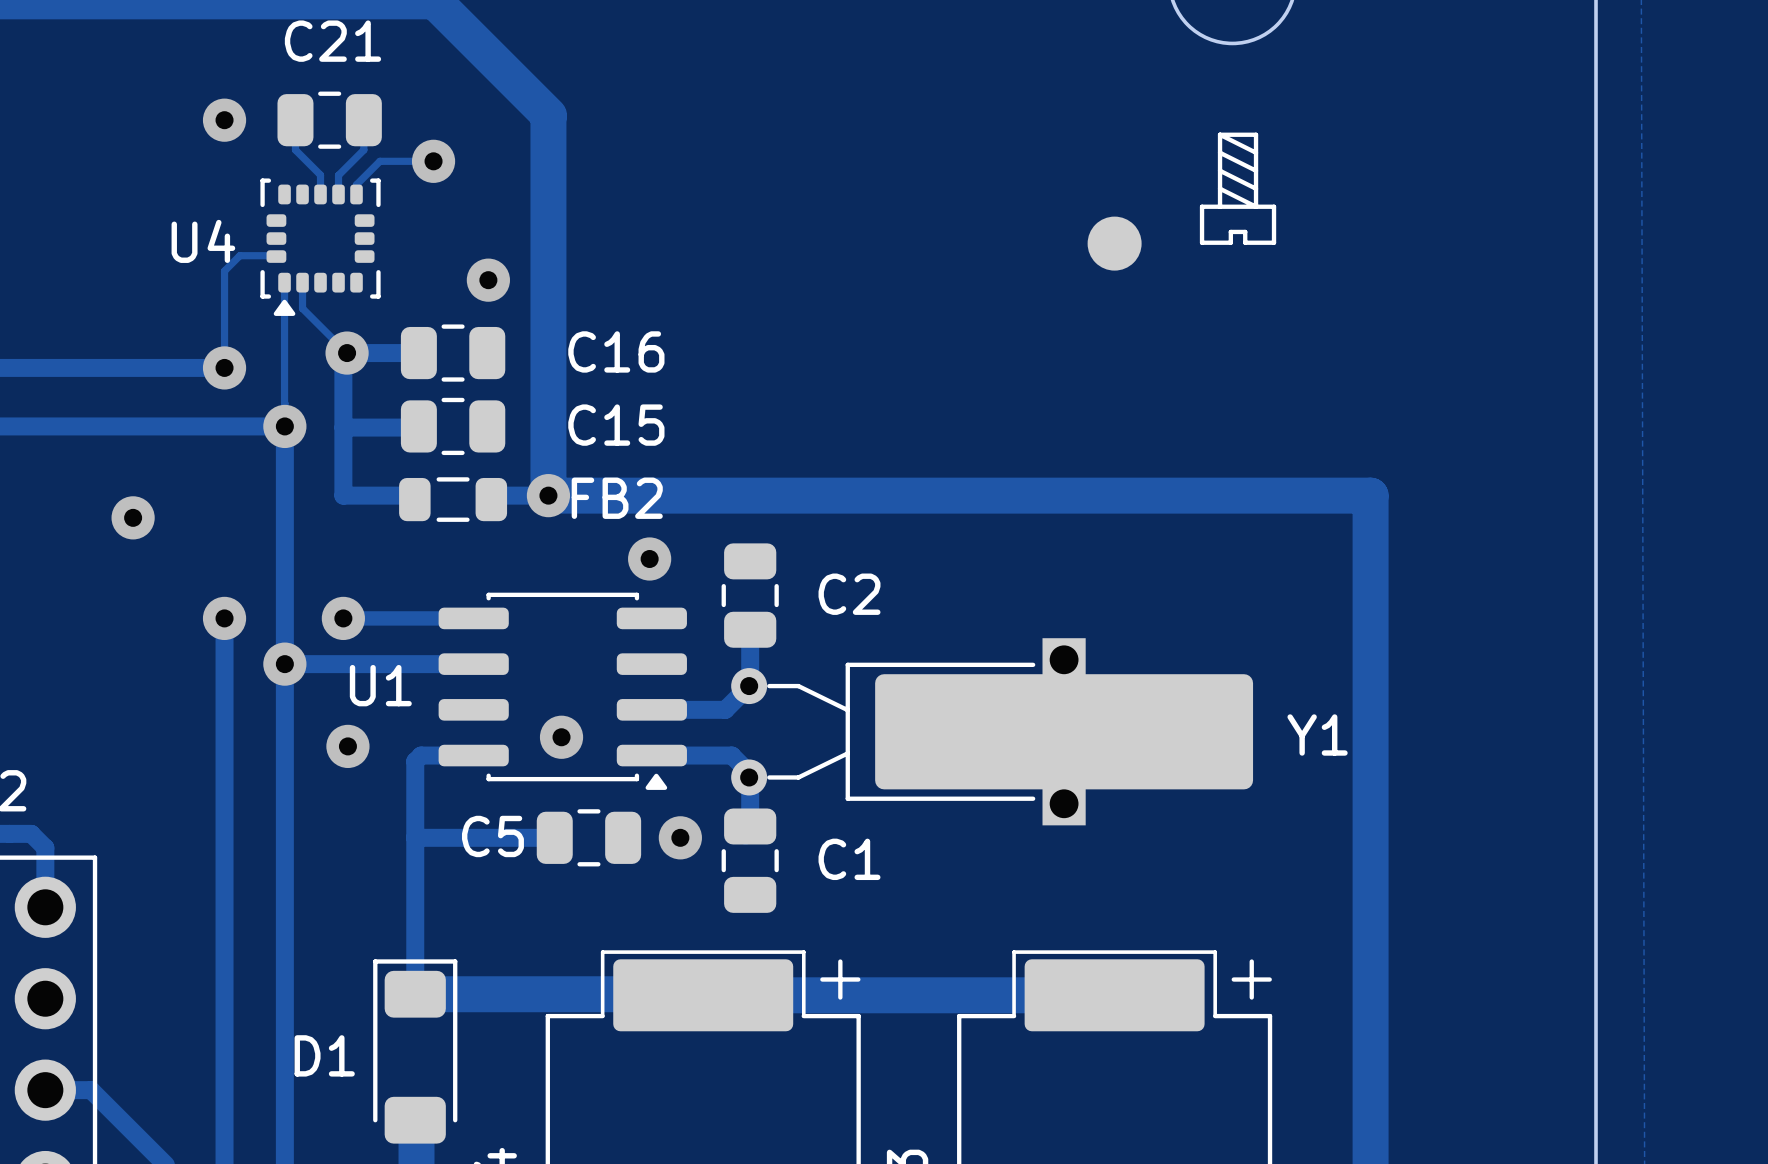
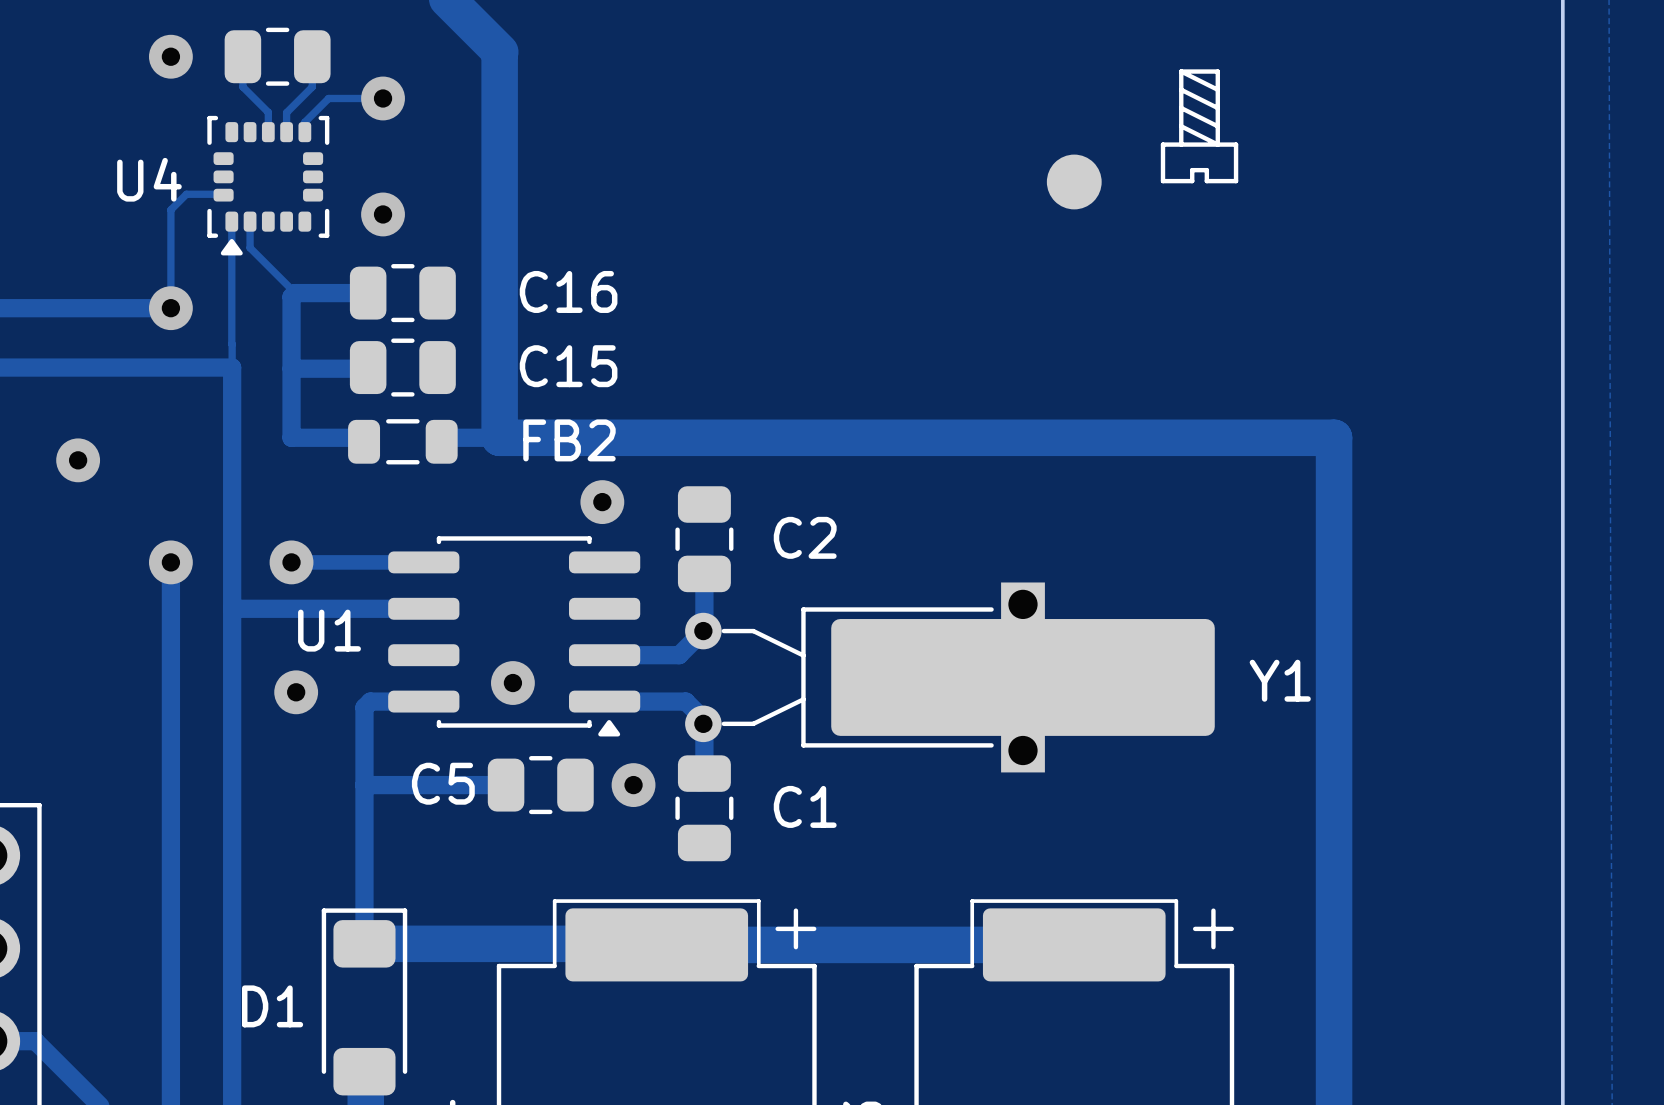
via position: (488, 280) -> (383, 214)
via: (347, 353) -> none
via: (284, 426) -> none
via: (548, 495) -> none
via: (284, 664) -> none

